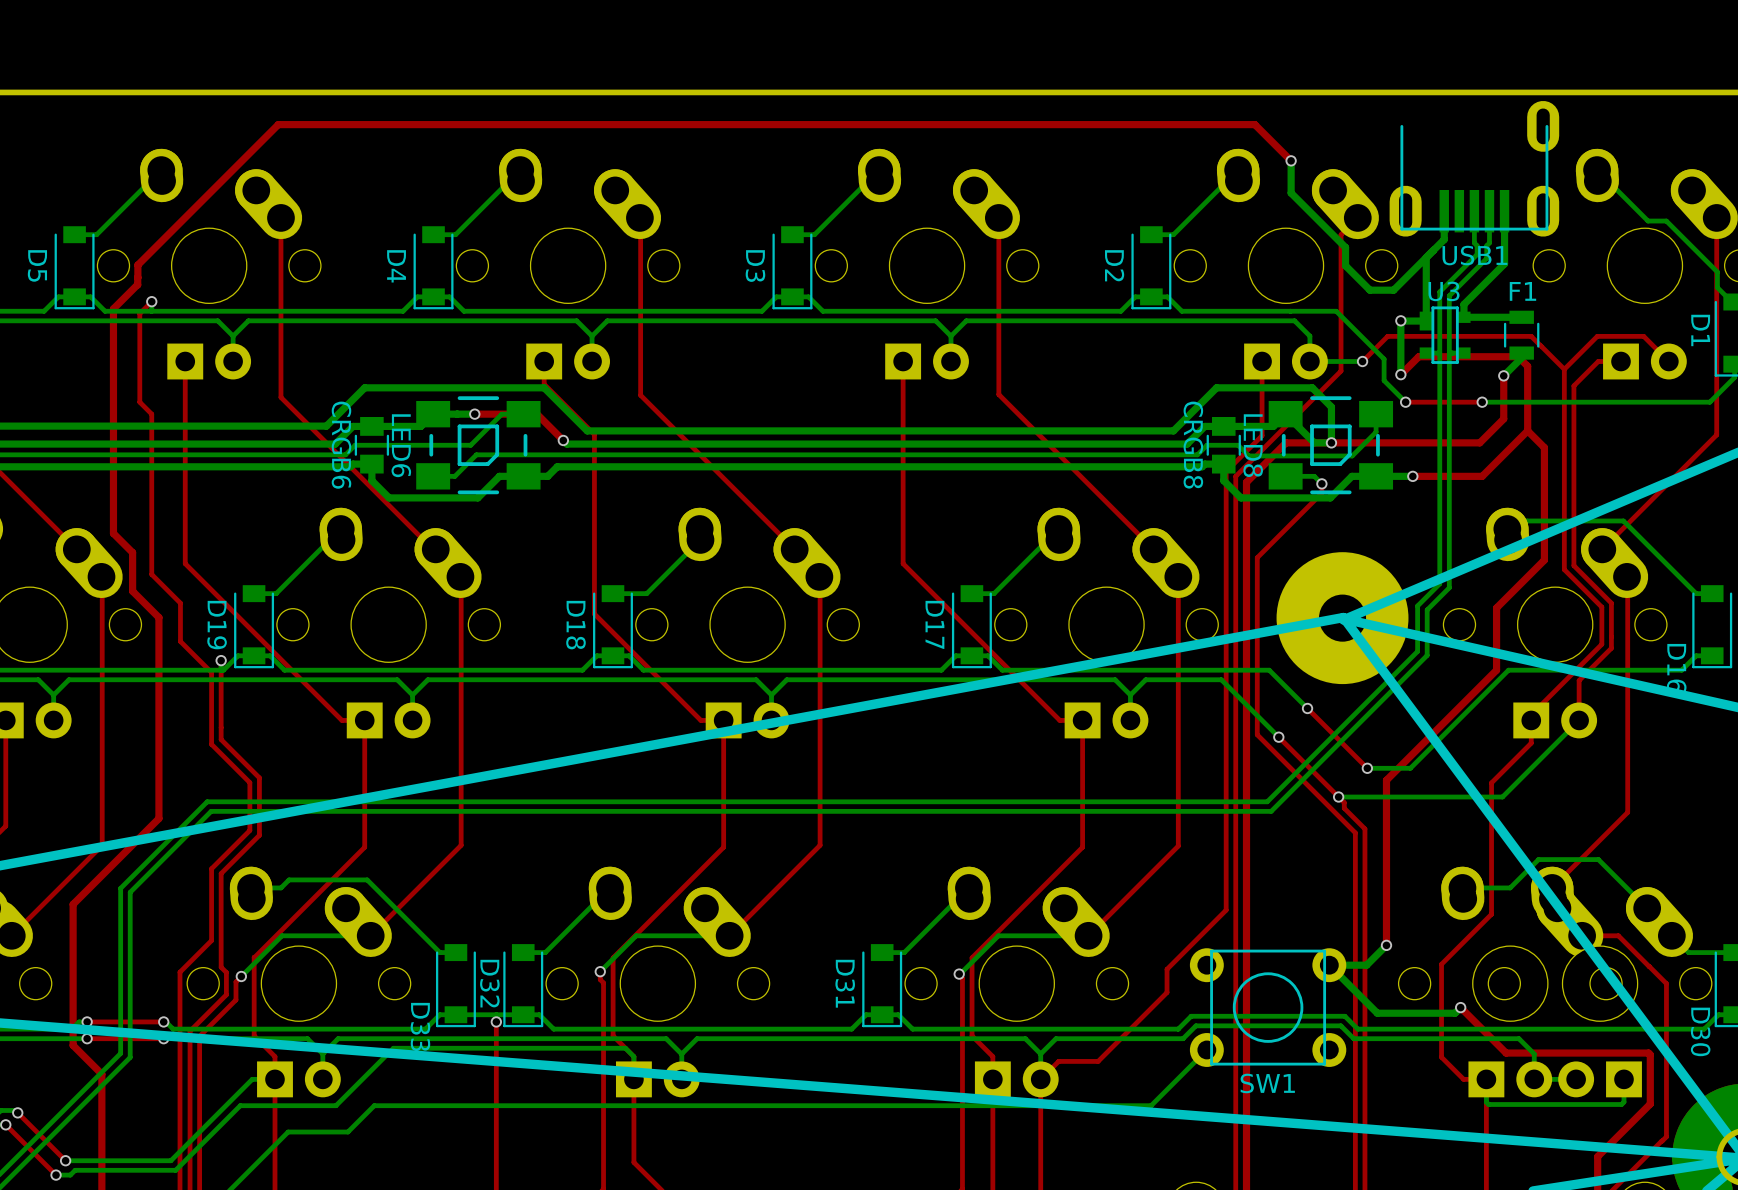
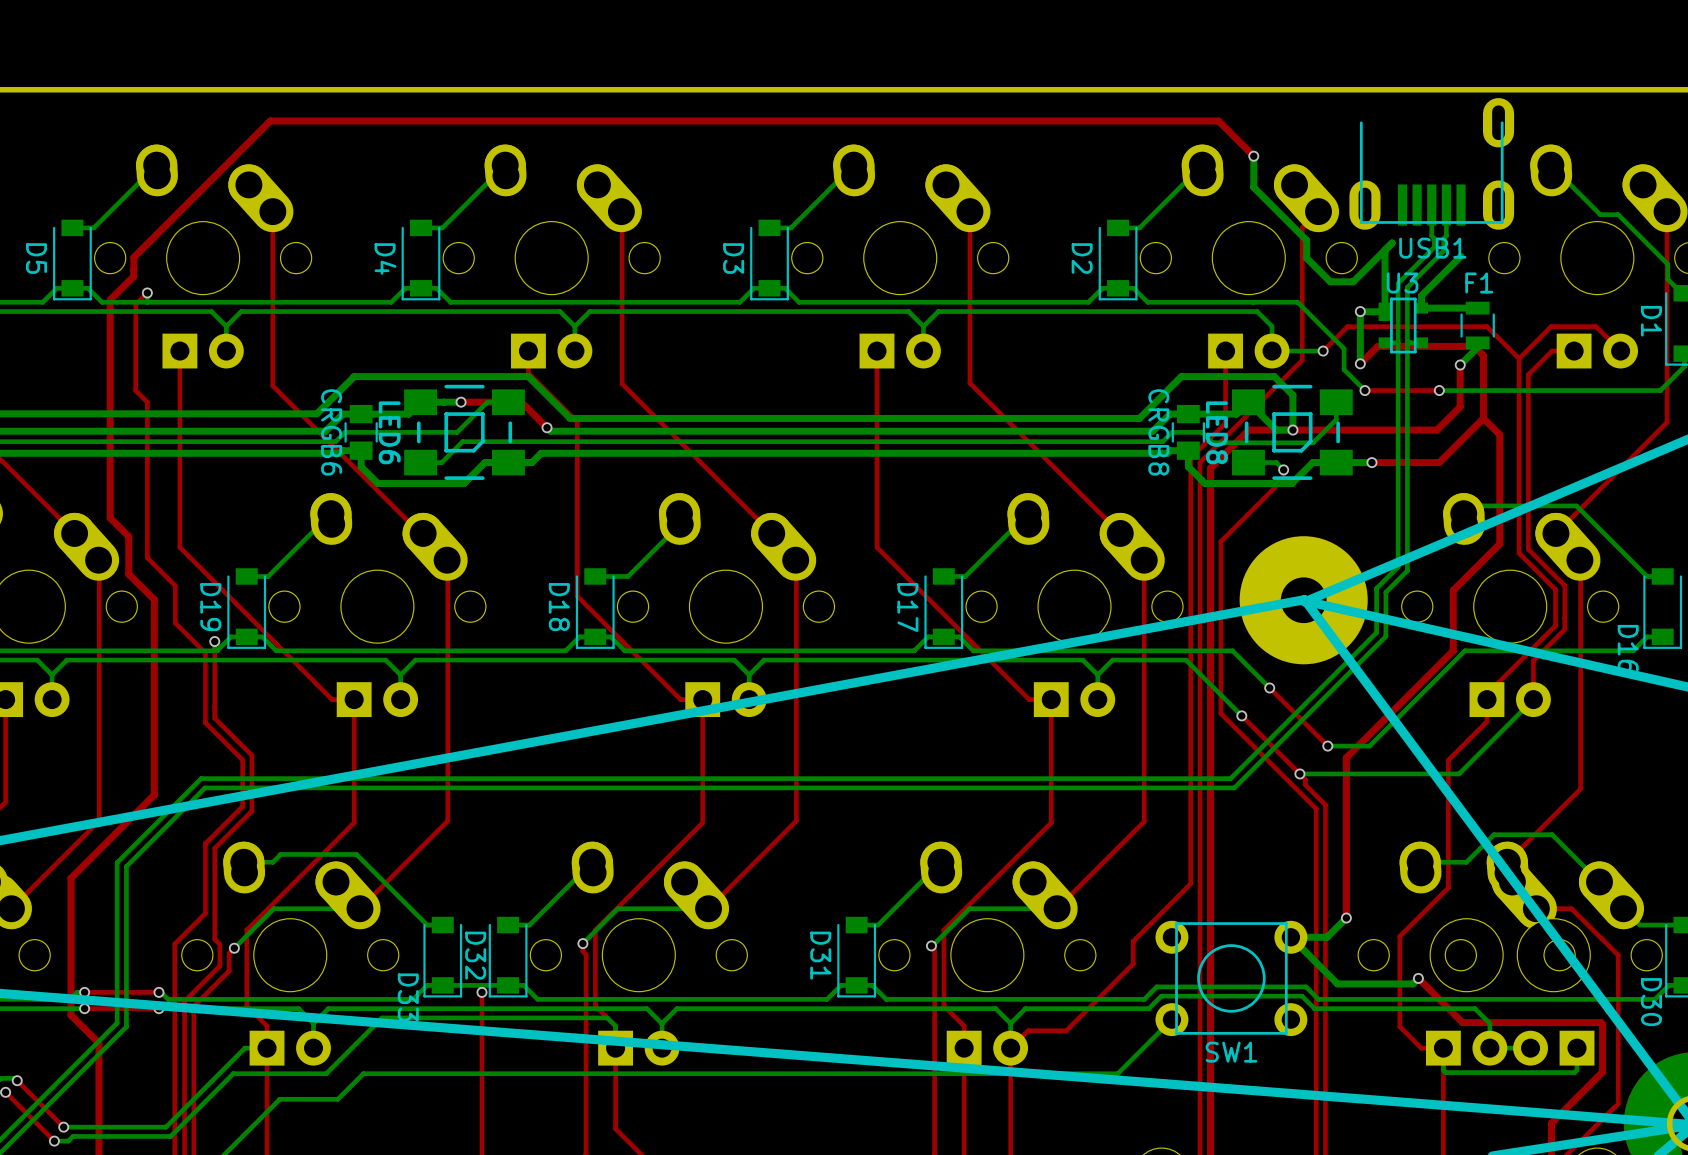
bottom track: (1444, 211) (1444, 239) (1433, 250) -> none
bottom track: (1504, 211) (1504, 263) -> none

